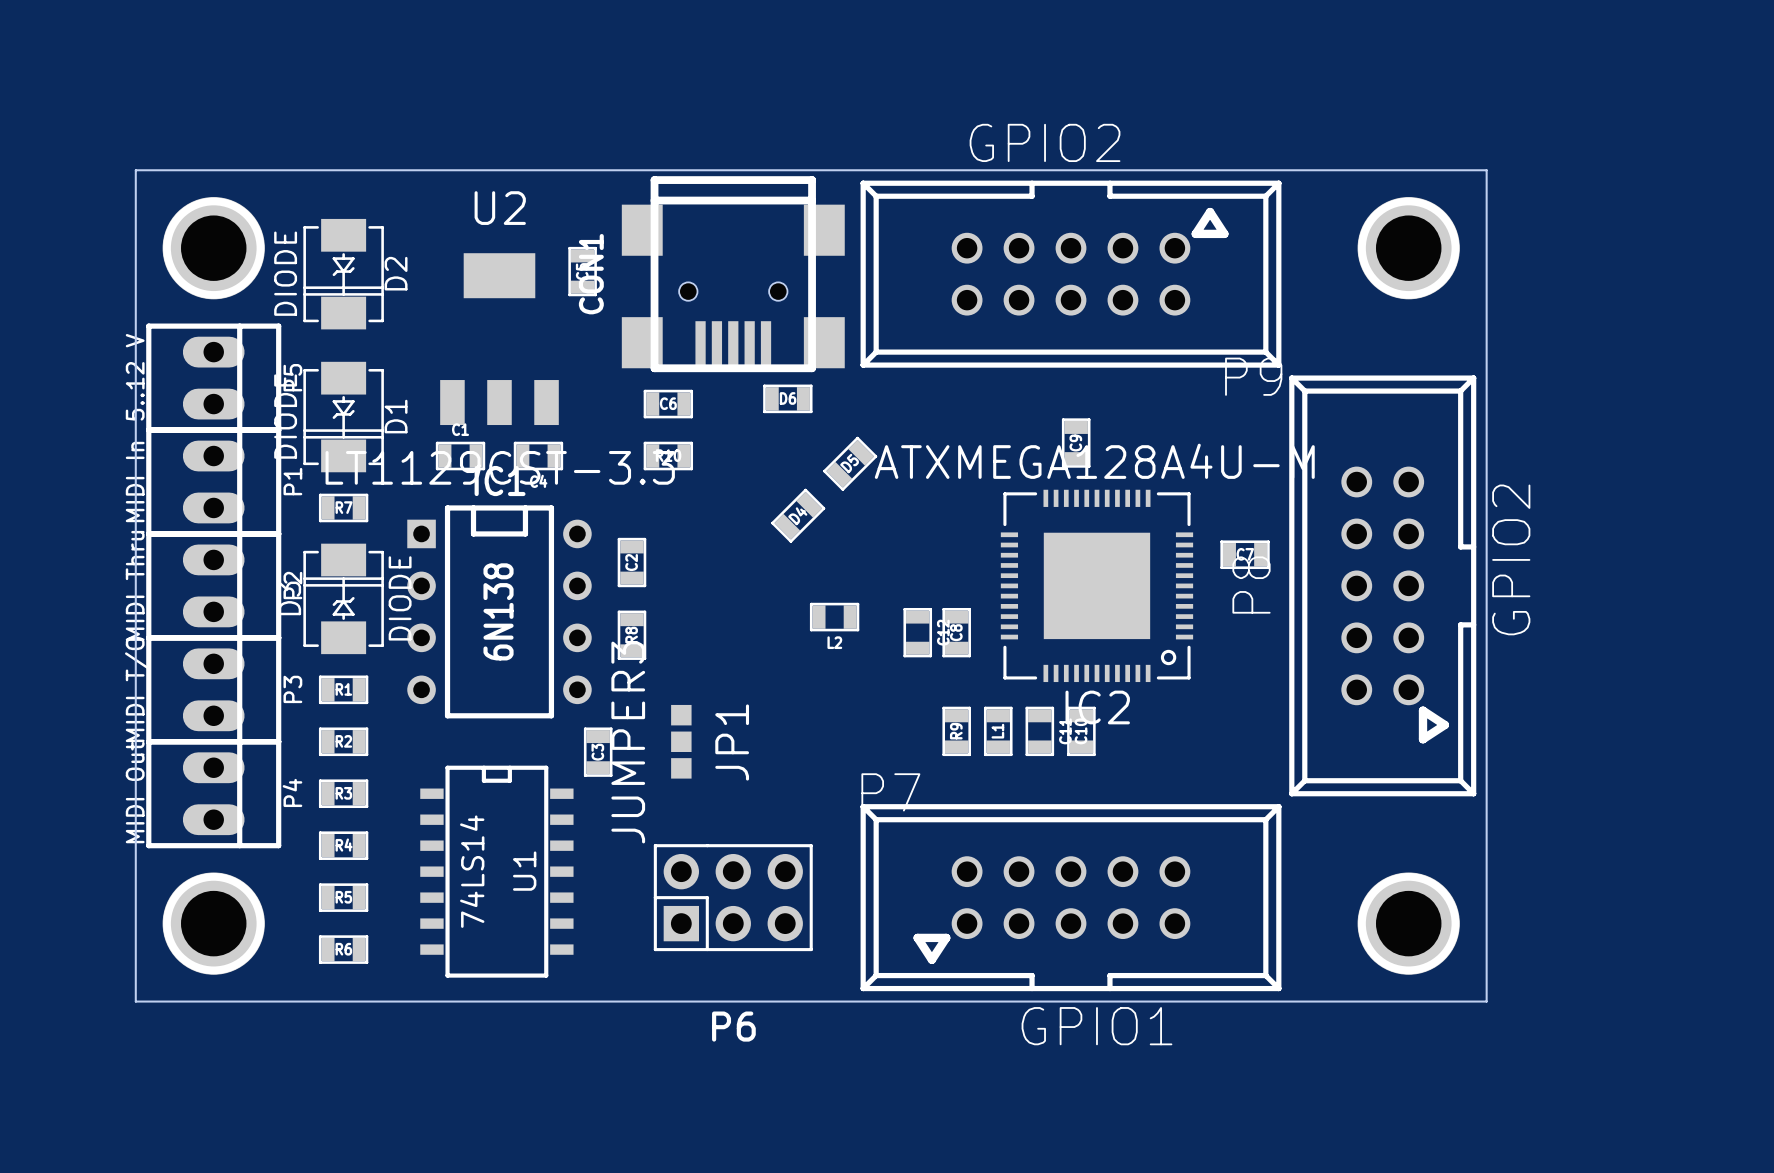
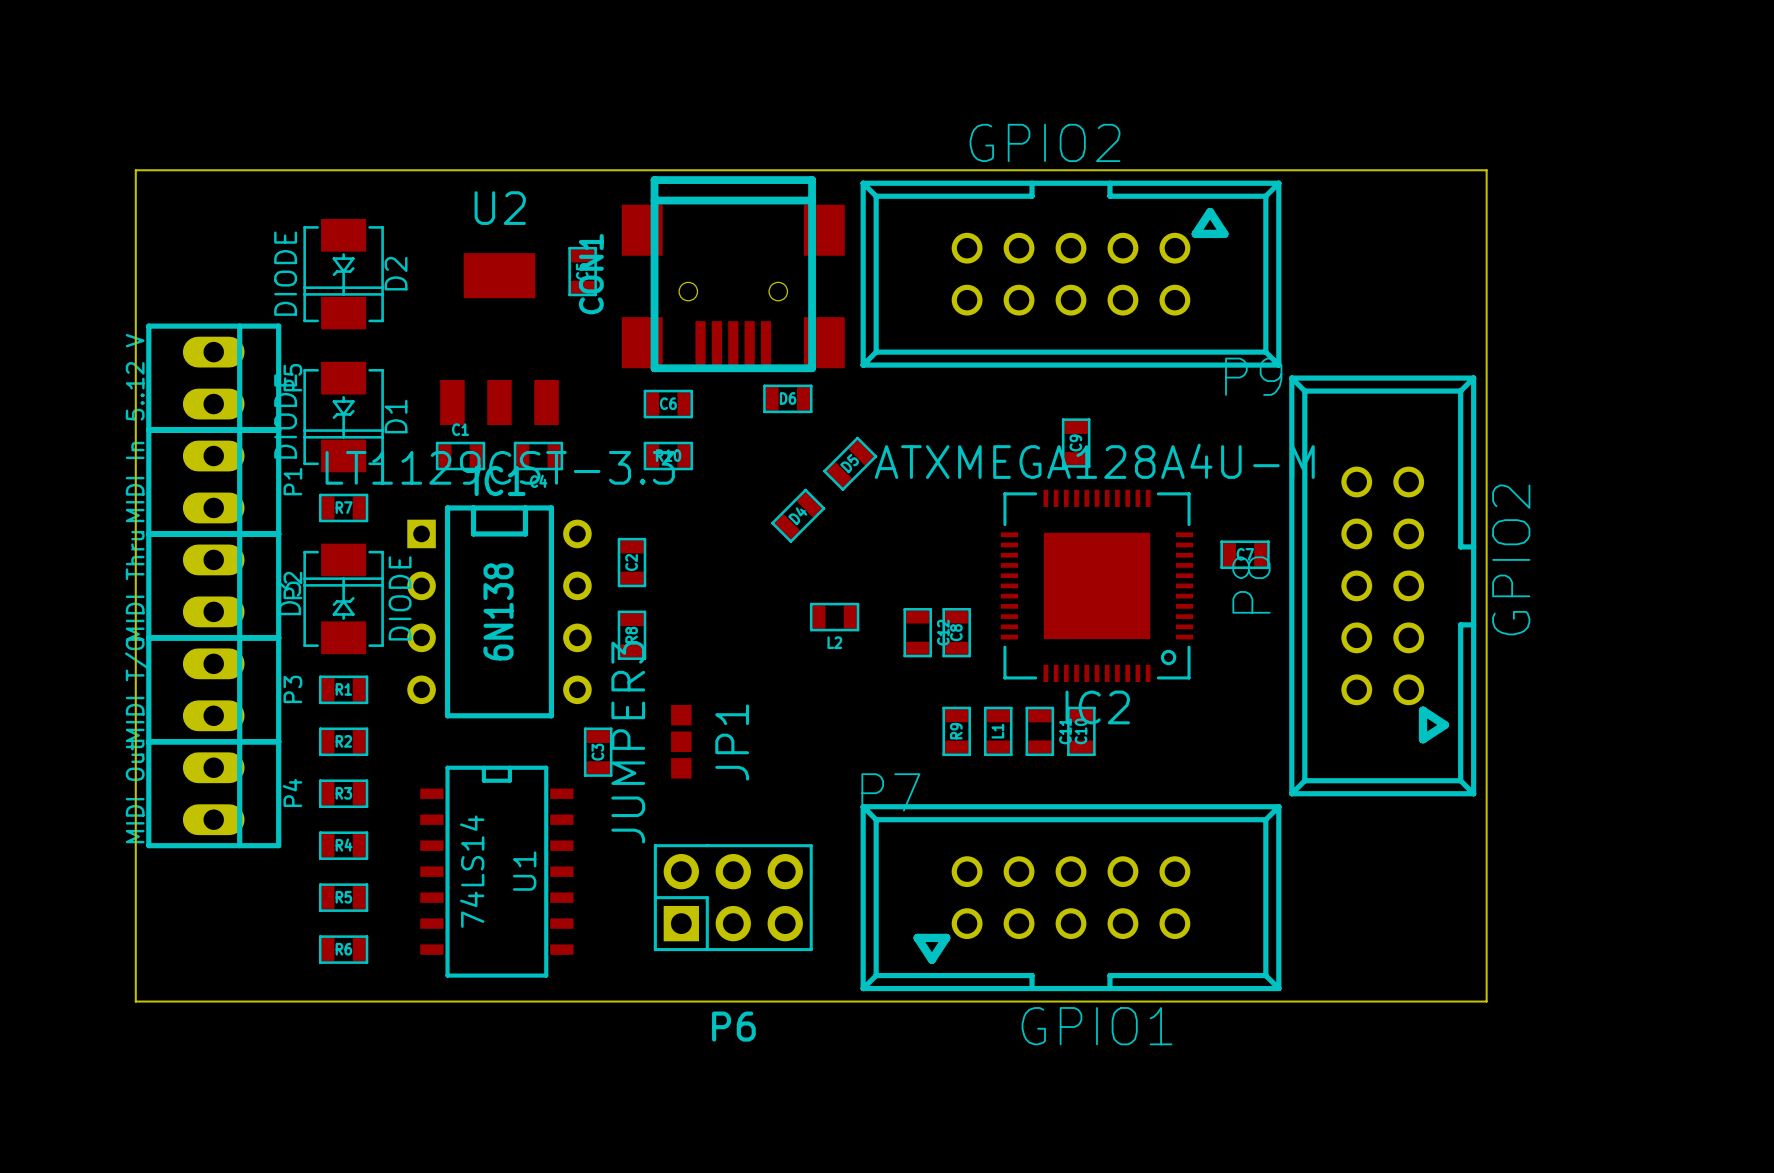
part: (213, 248) -> none
part: (1408, 248) -> none
part: (213, 923) -> none
part: (1408, 923) -> none

